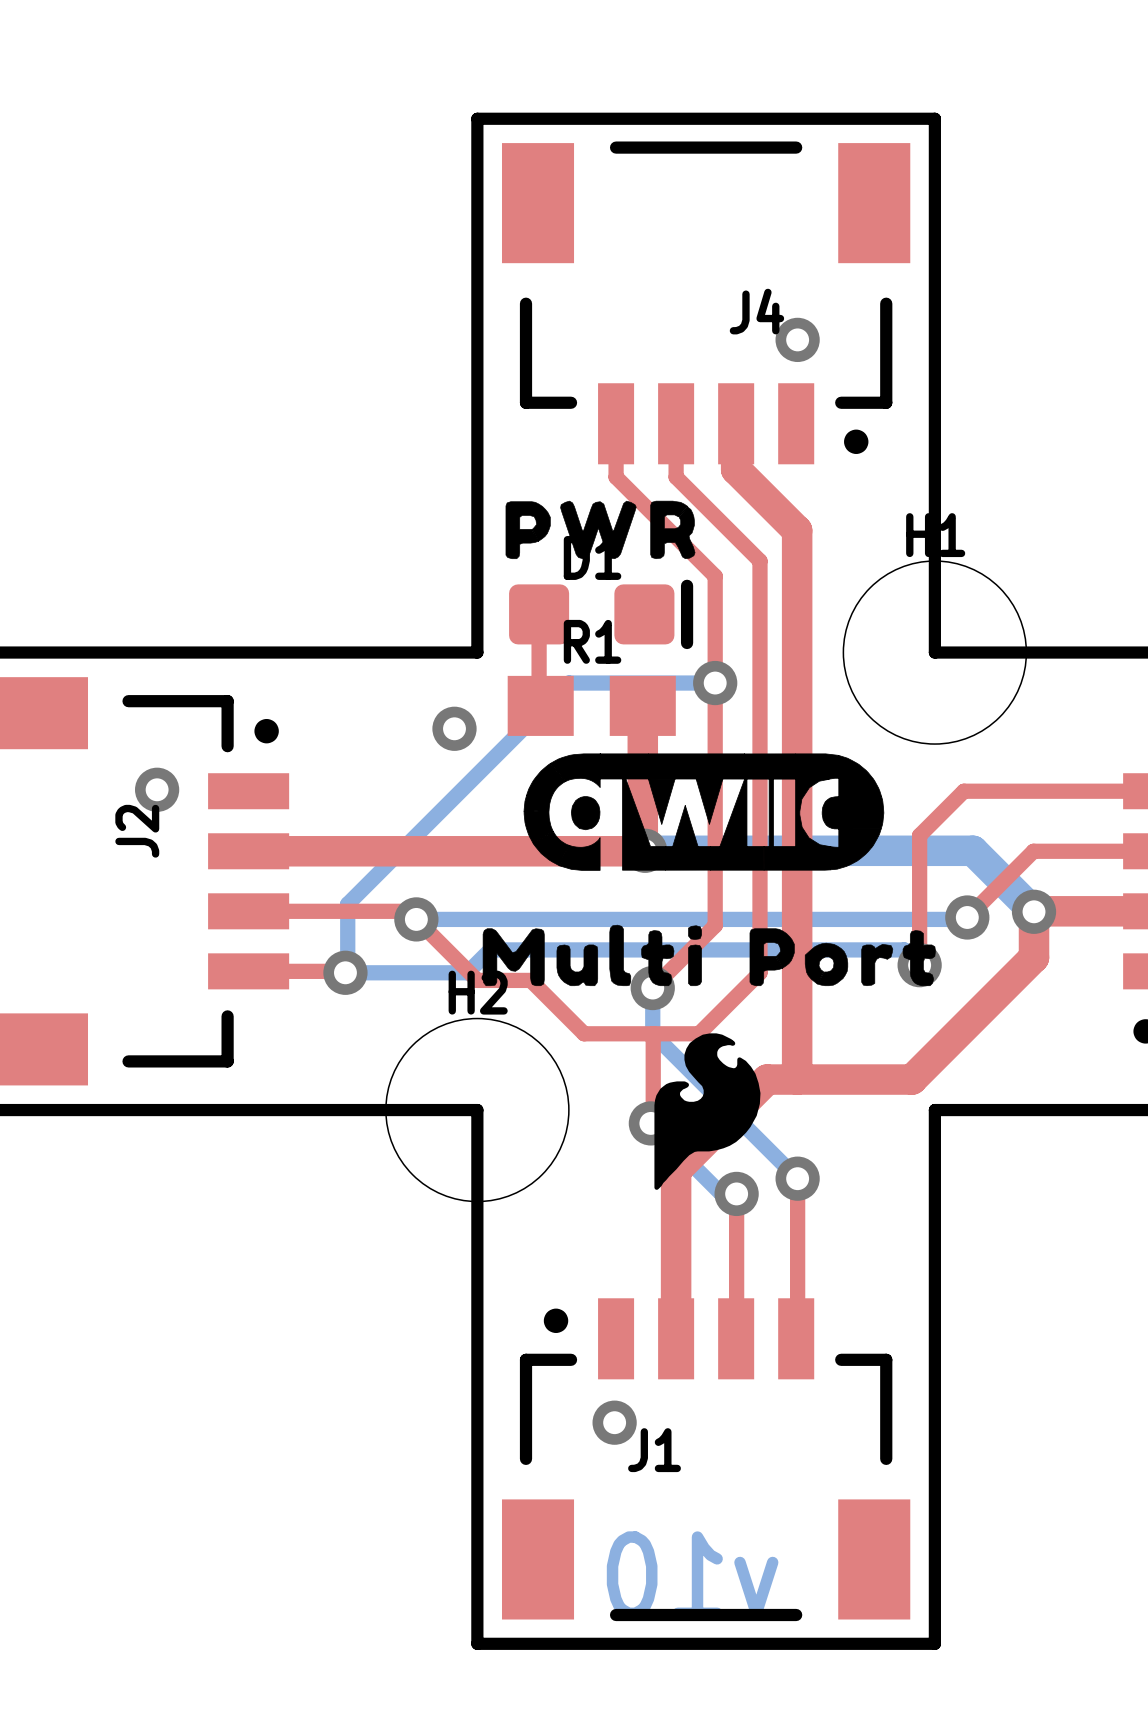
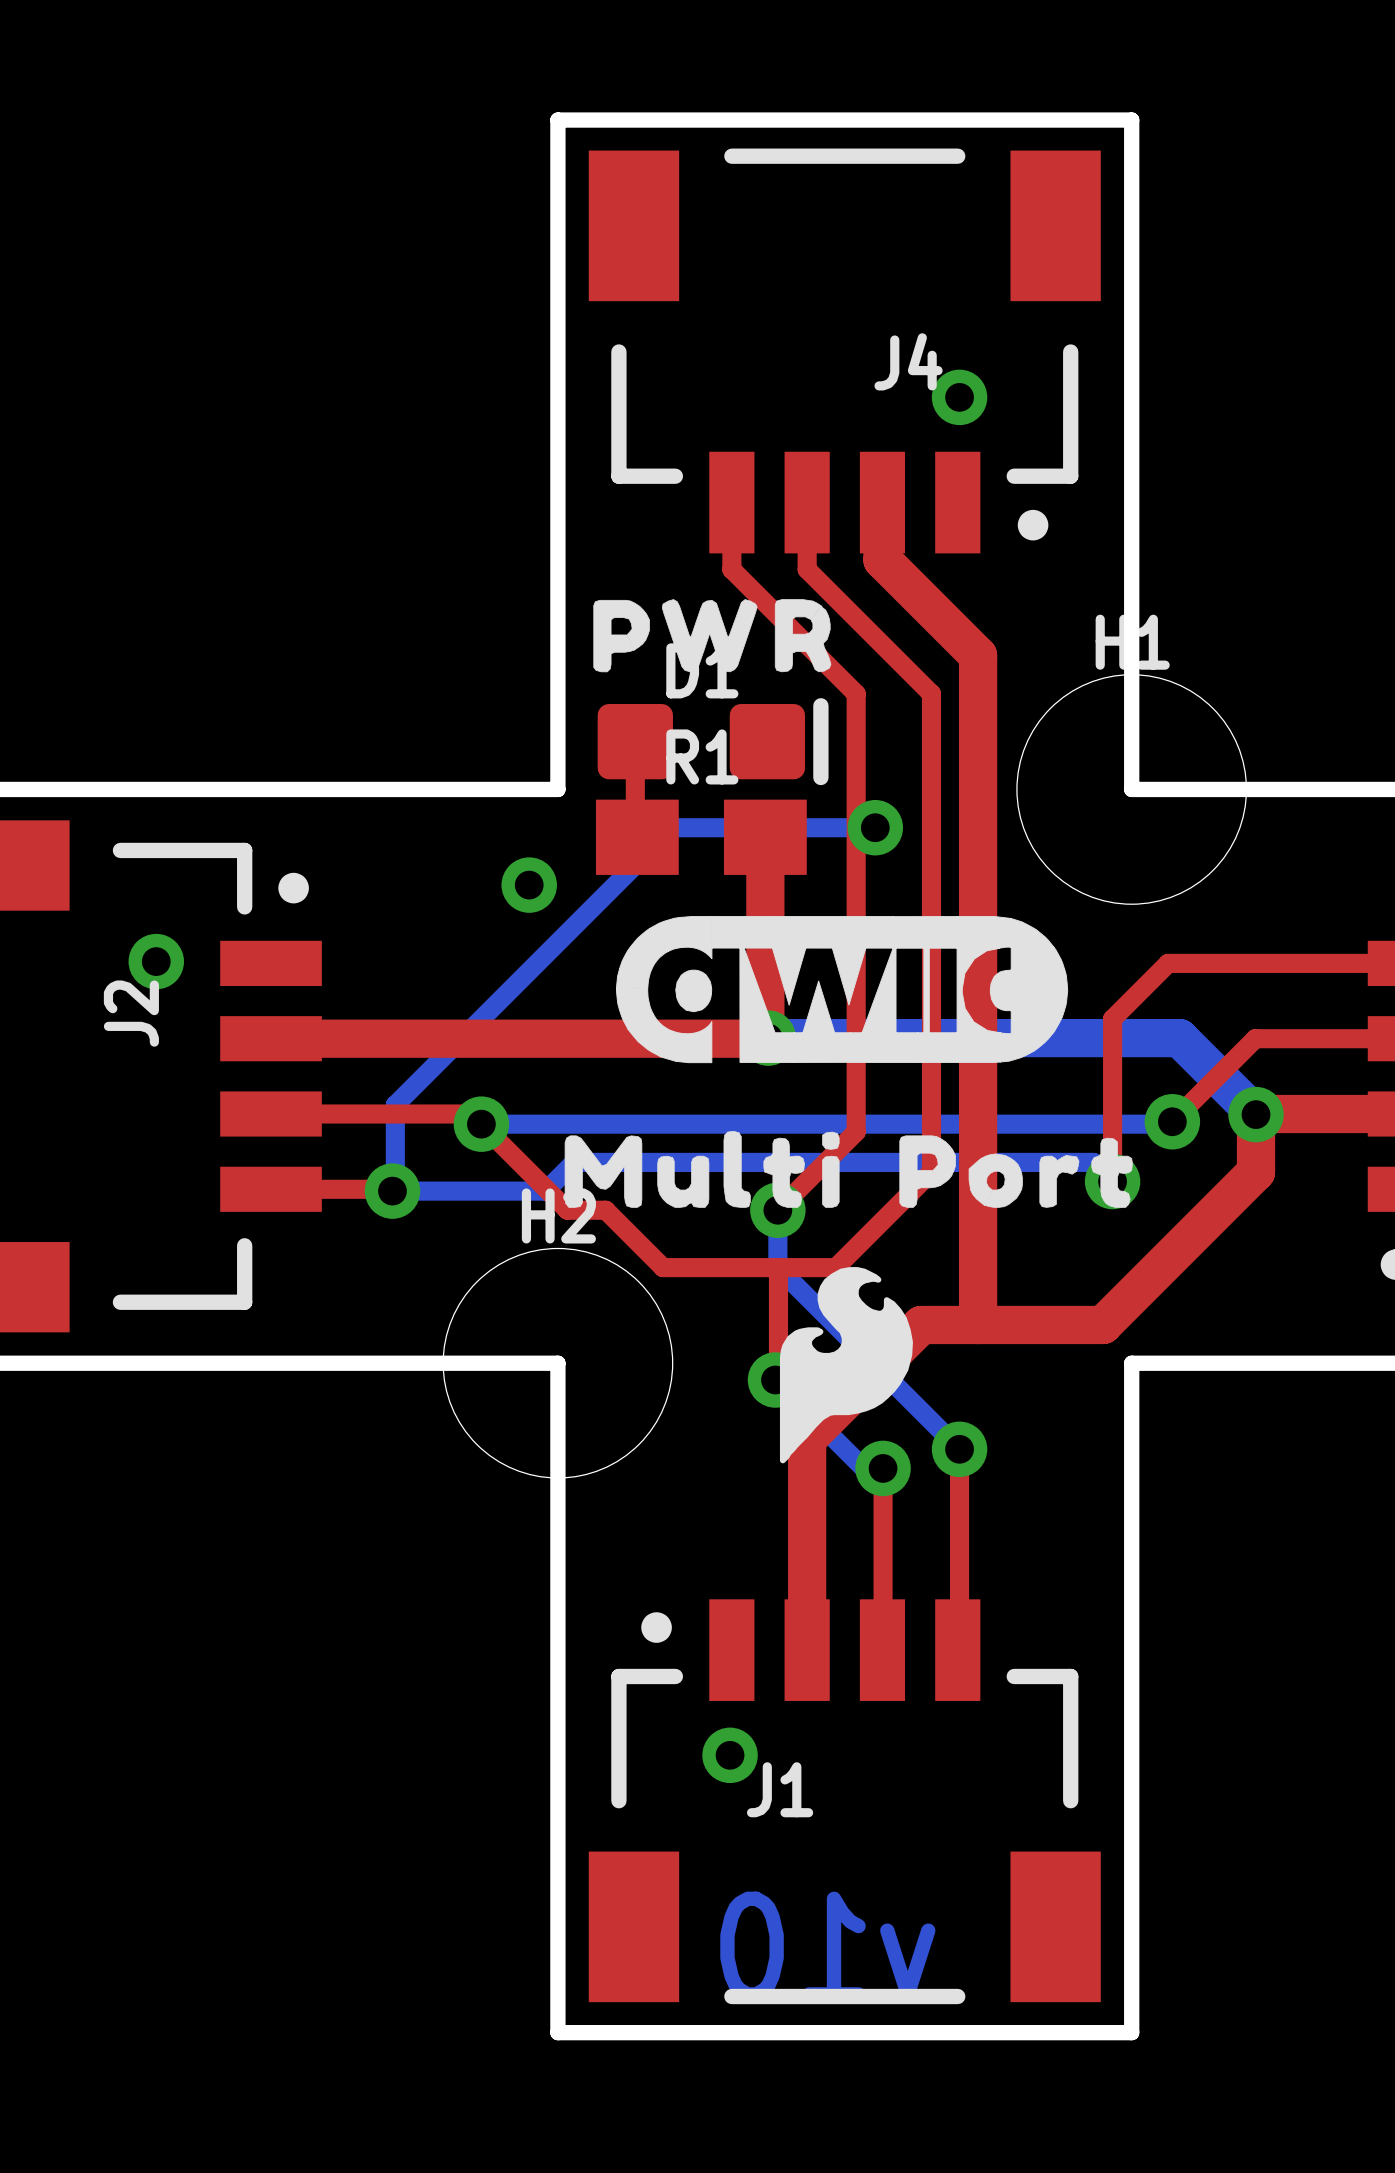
top track: (797, 530) (797, 1079) -> (958, 636) (978, 655) (978, 1324)
top track: (759, 561) (759, 972) -> (912, 674) (931, 693) (931, 1171) (912, 1191)
via position: (715, 683) -> (875, 827)
R1 position: (591, 705) -> (701, 837)
top track: (477, 980) (530, 980) (584, 1033) -> (557, 1200) (567, 1210) (605, 1210) (663, 1267) (691, 1267)

